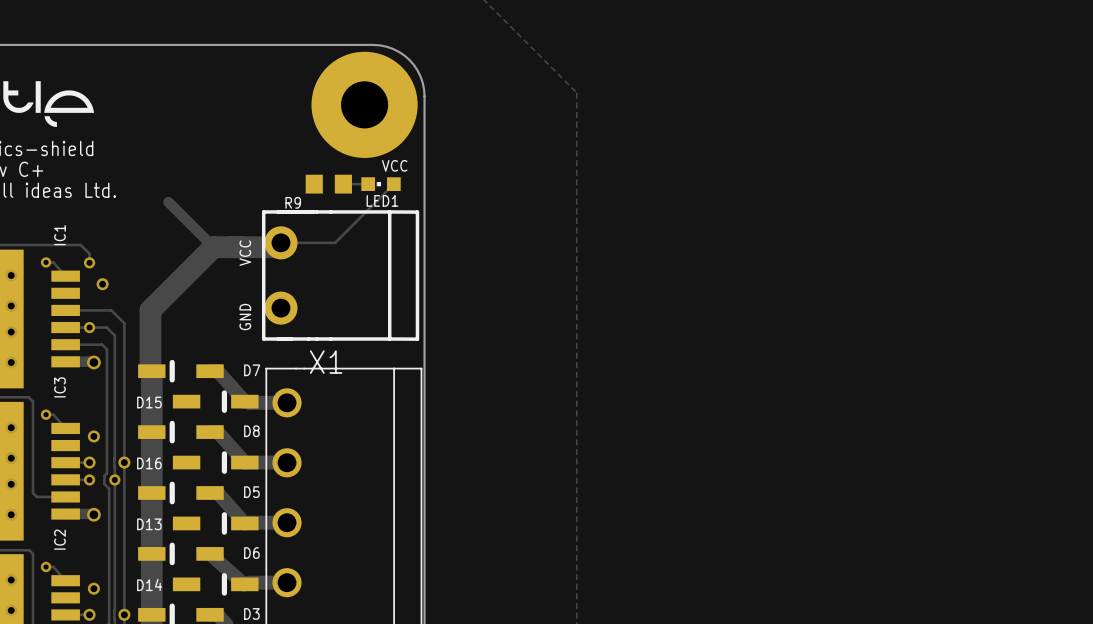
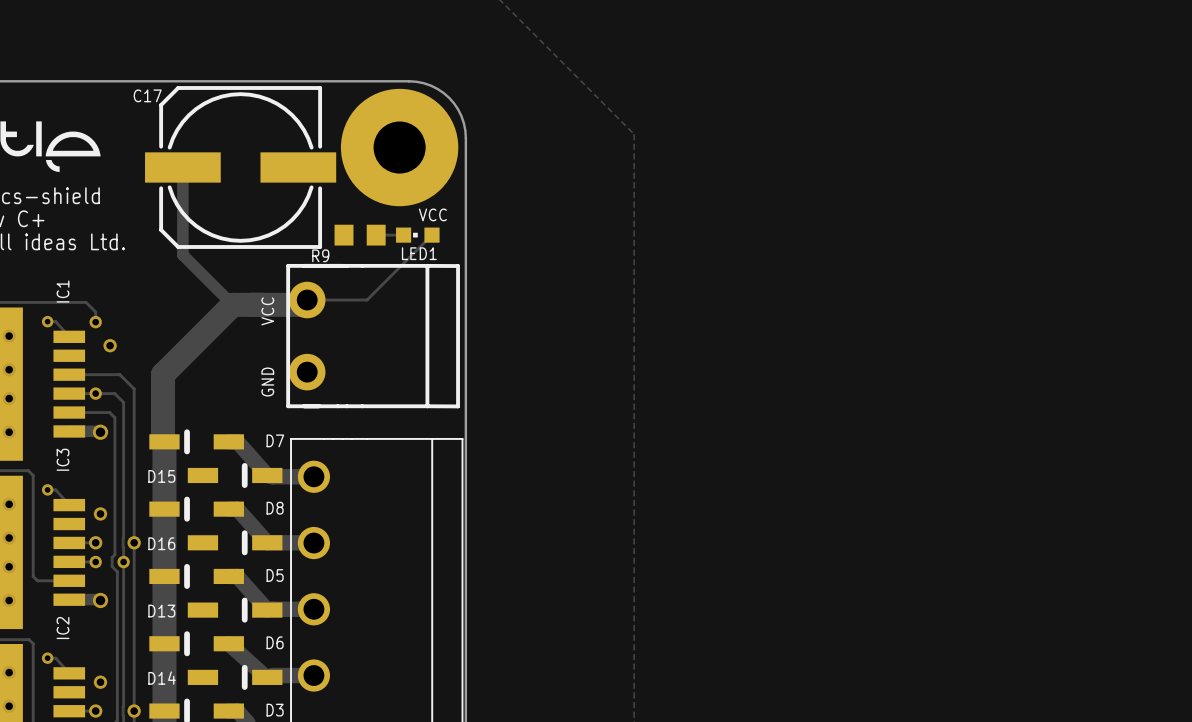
track: none -> (182, 167) (182, 255)
C17: none -> (240, 167)
X1 name: X1 (326, 362) -> none

